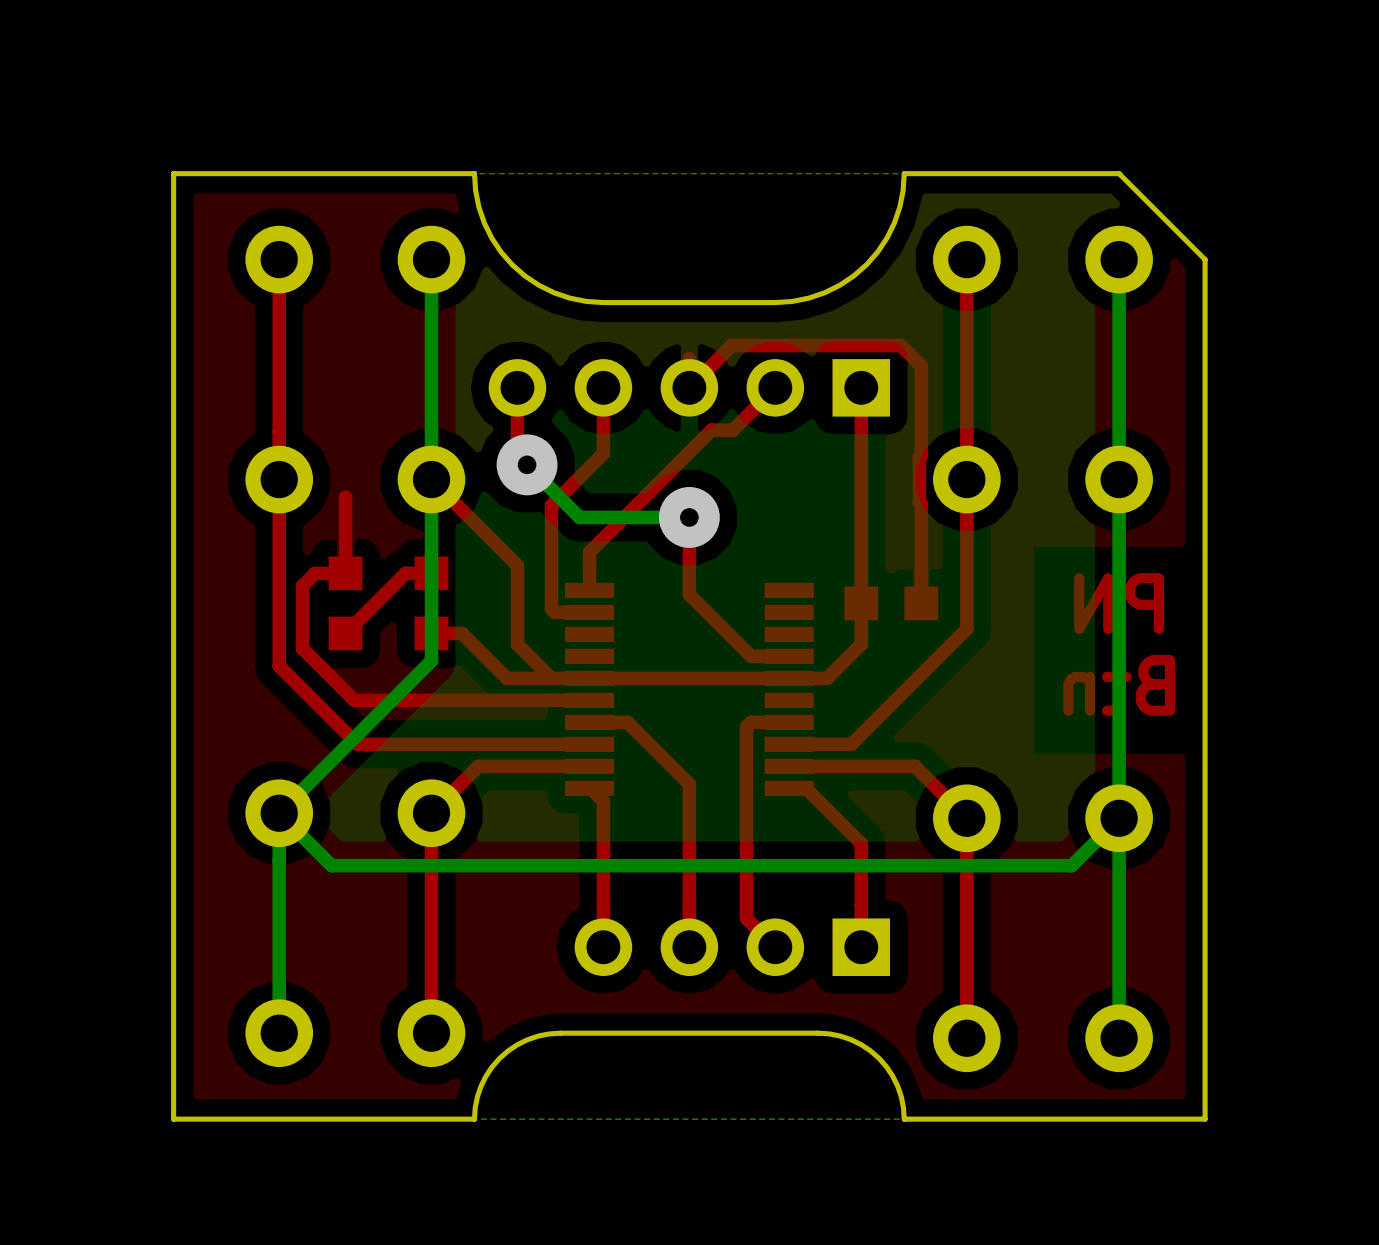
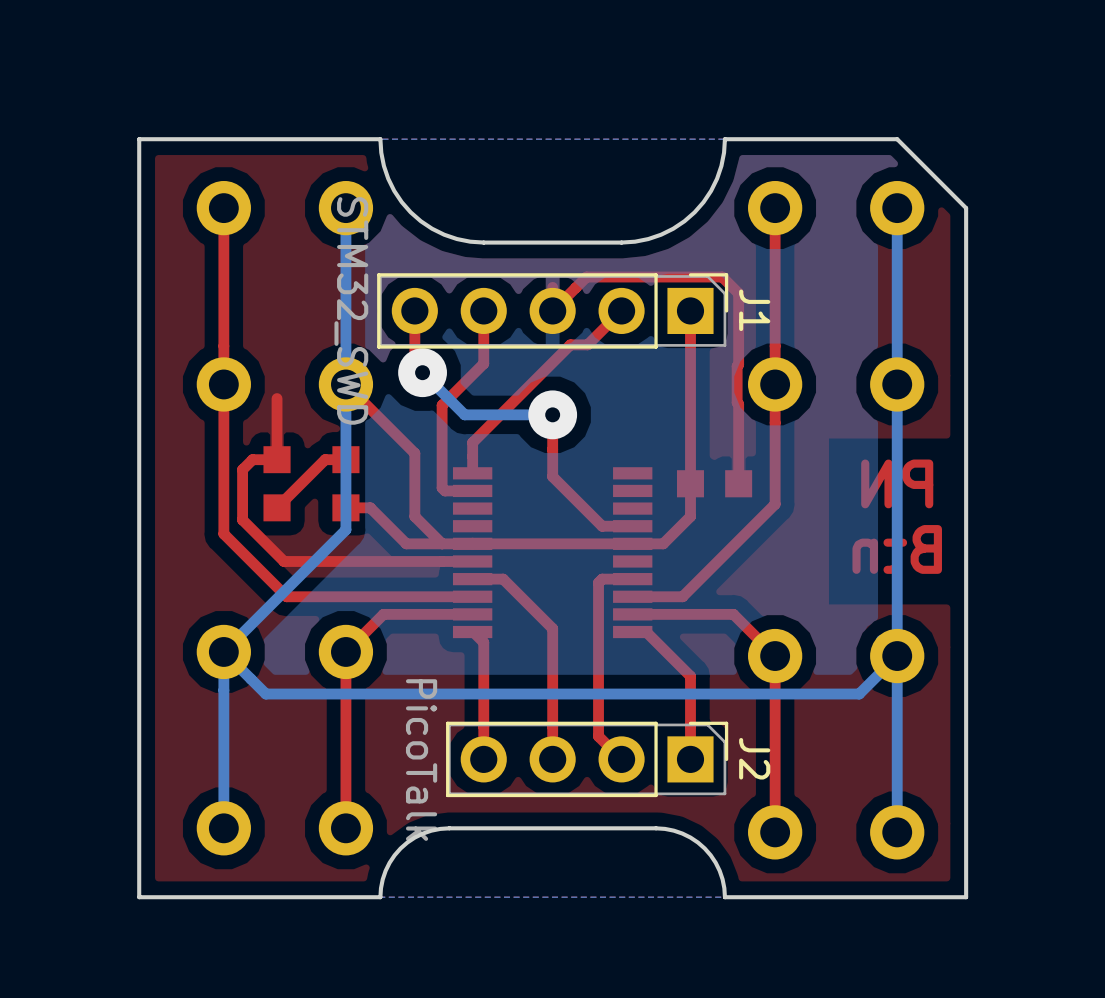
J1 side: top (689, 387) -> bottom (552, 310)
J2 side: top (732, 947) -> bottom (587, 759)

